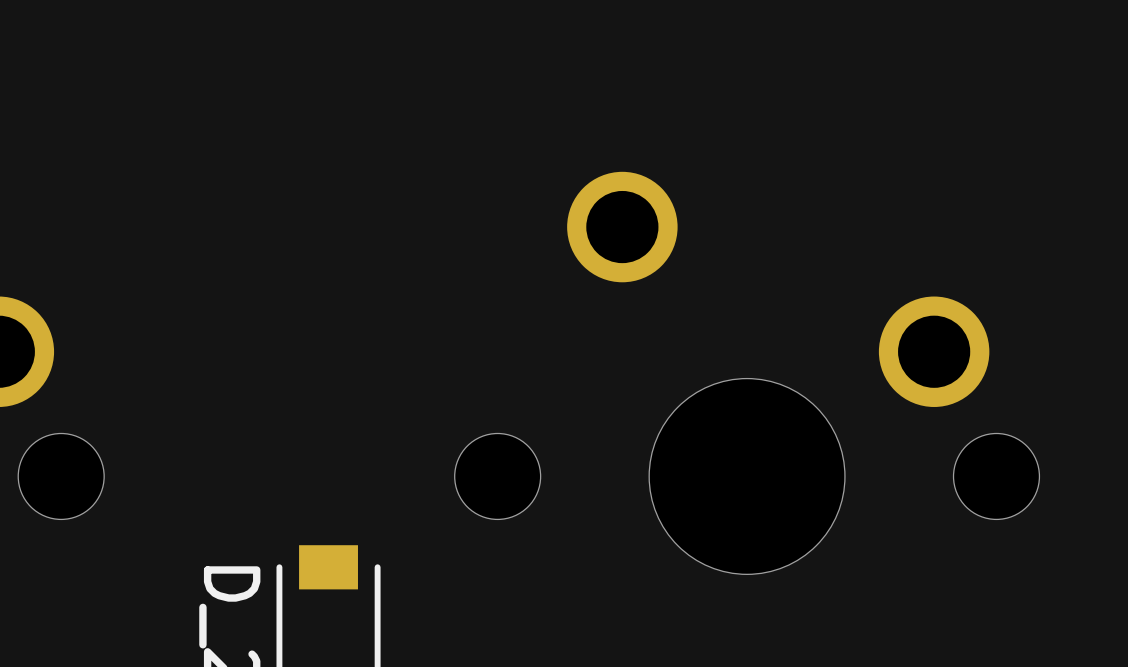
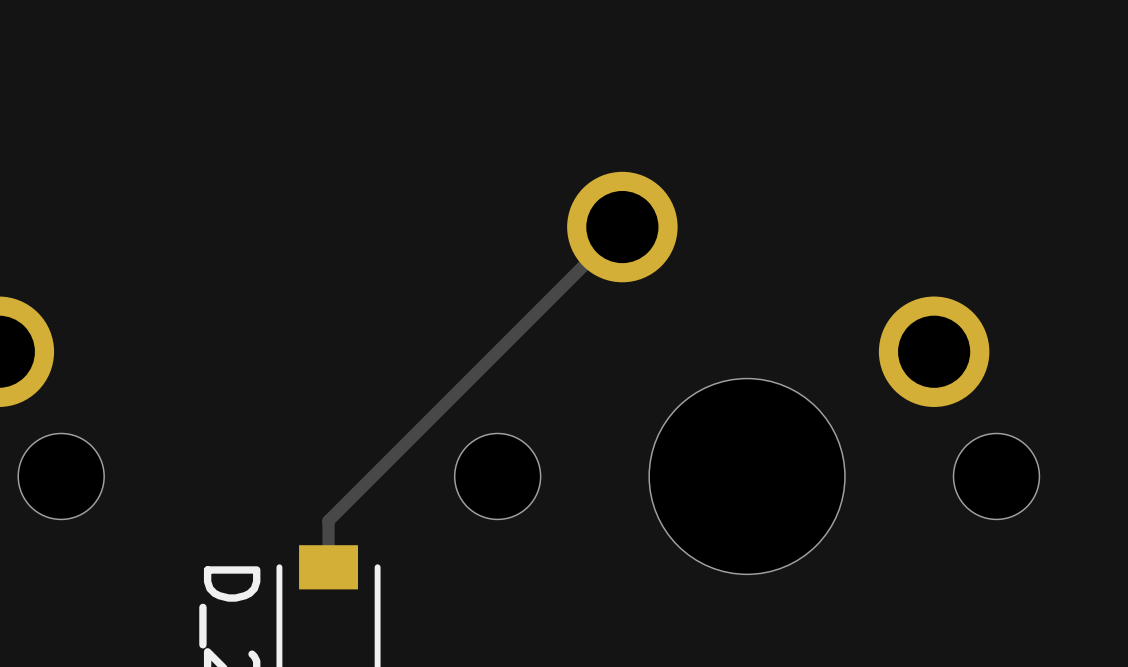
track: none -> (622, 227) (328, 520) (328, 567)

